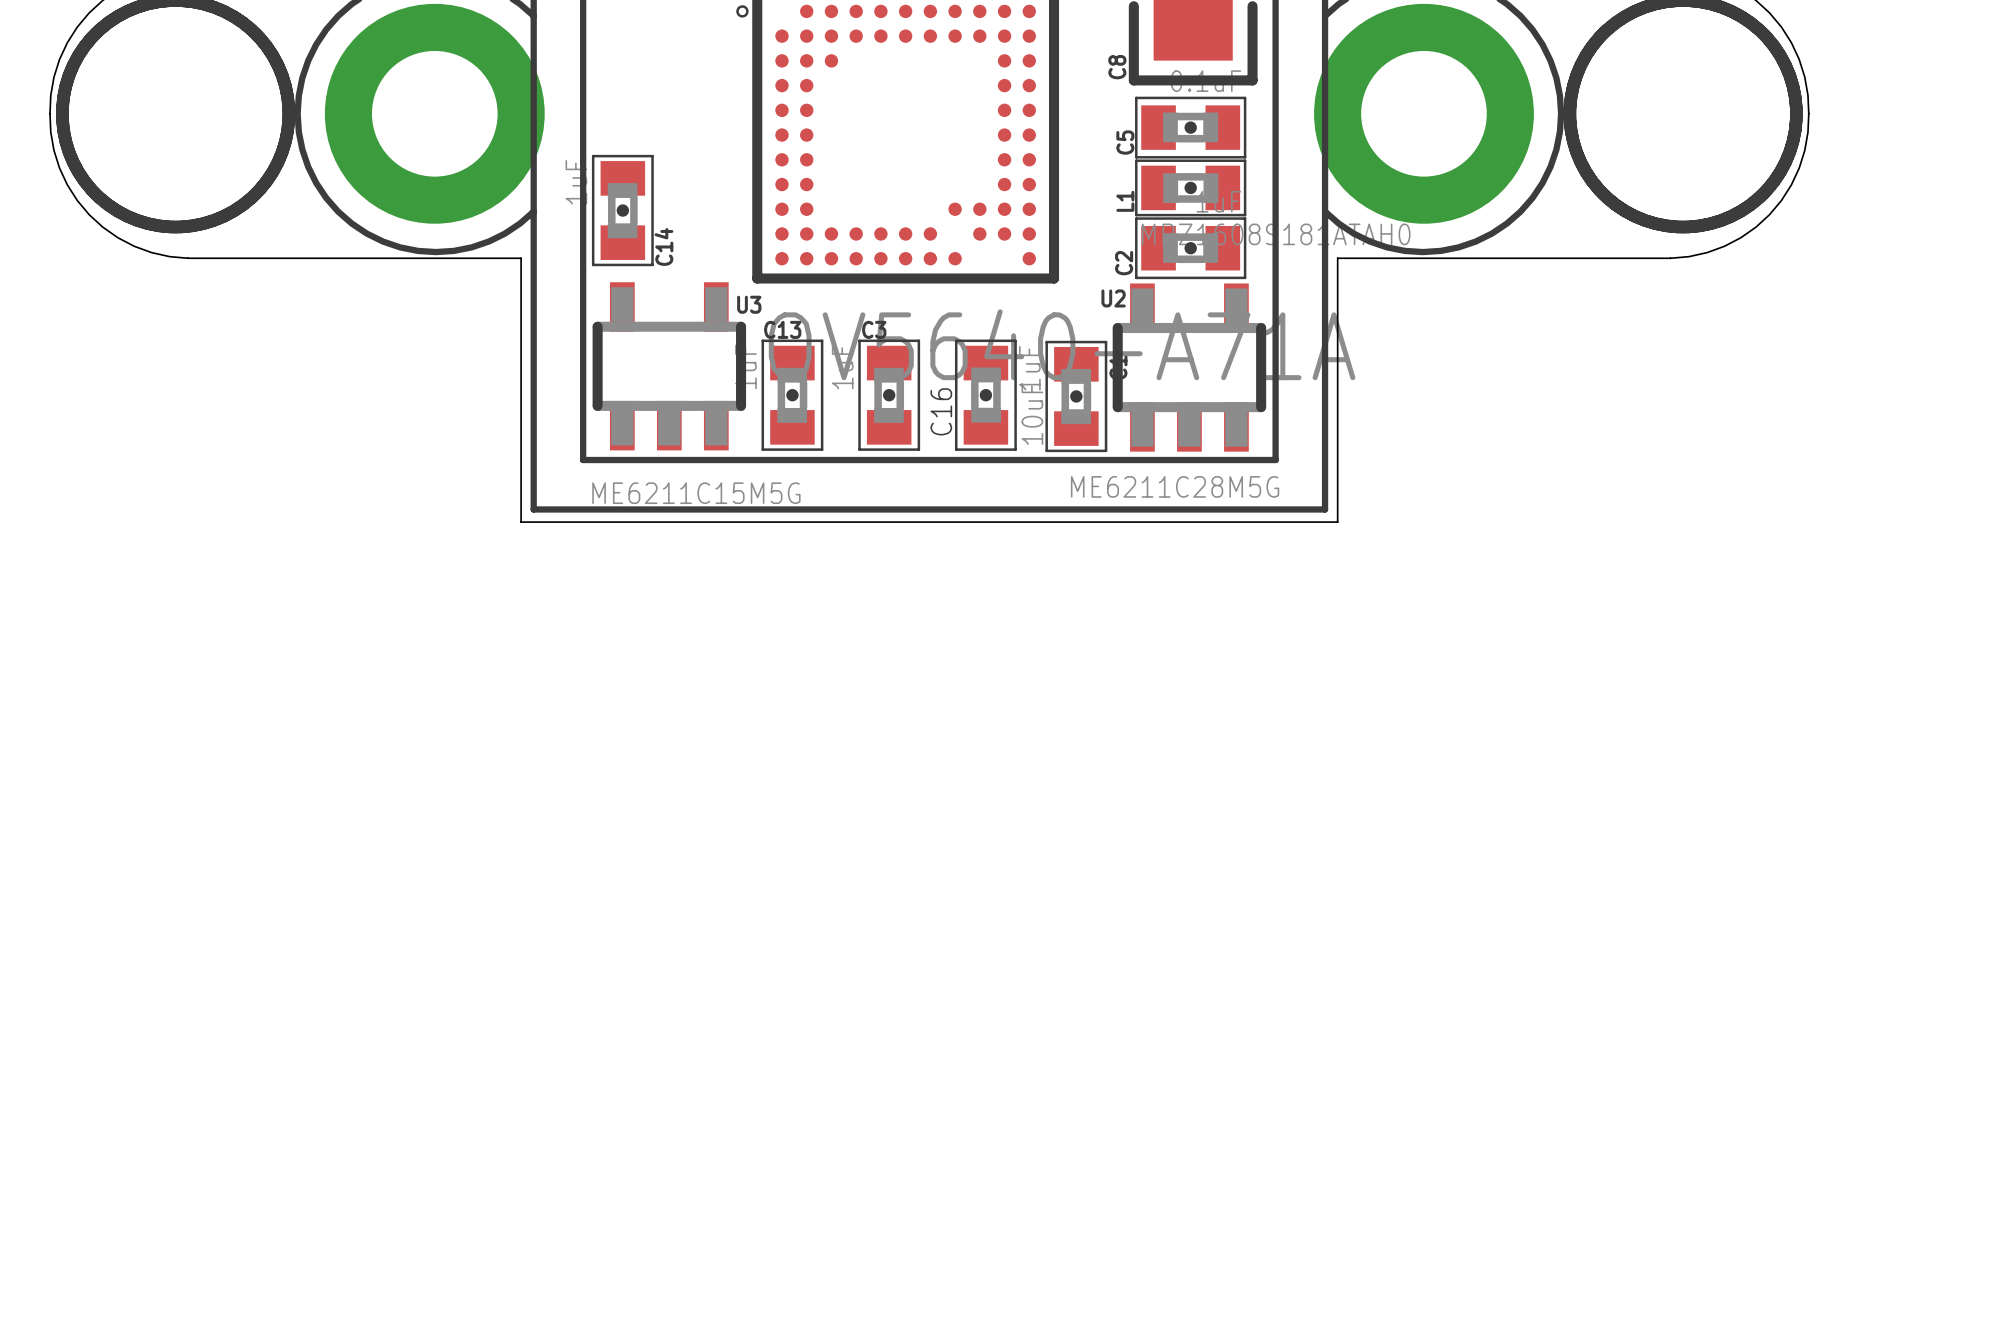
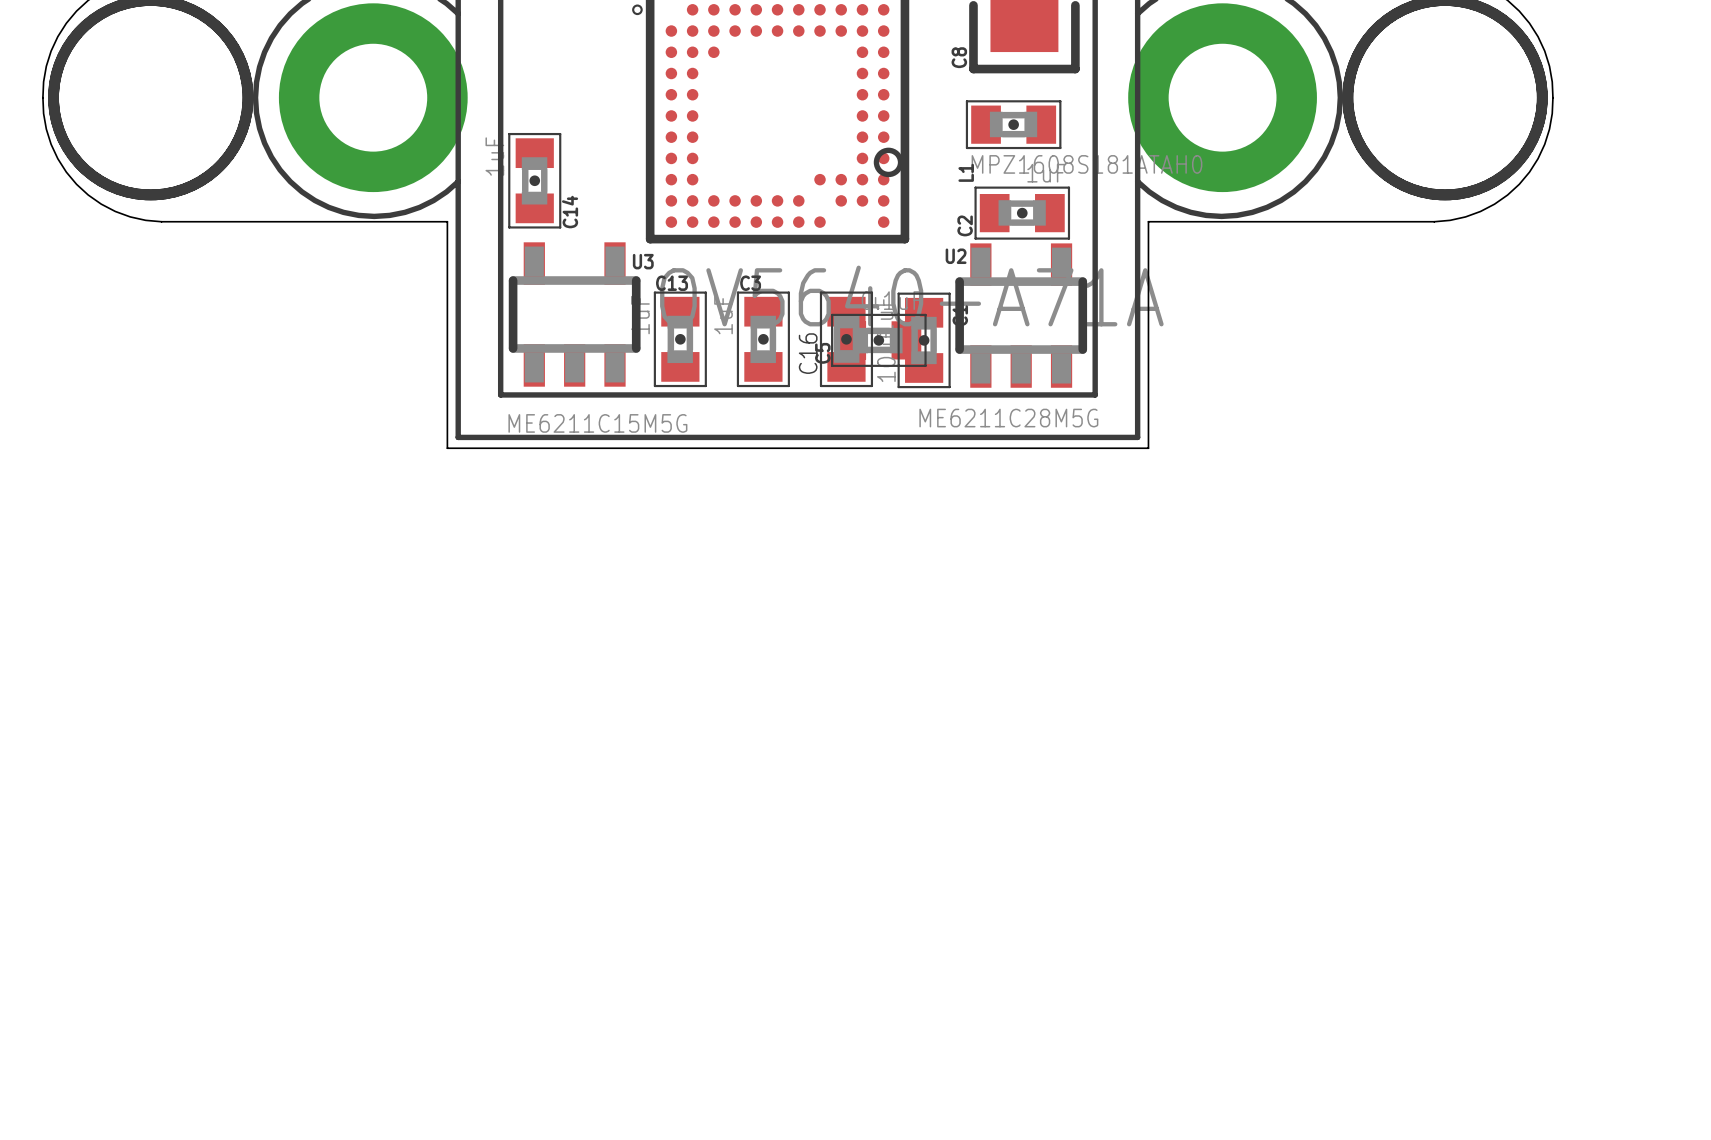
C5 position: (1190, 127) -> (878, 340)
drawing: none -> [873, 147, 904, 178]
L1 position: (1190, 187) -> (1013, 124)

